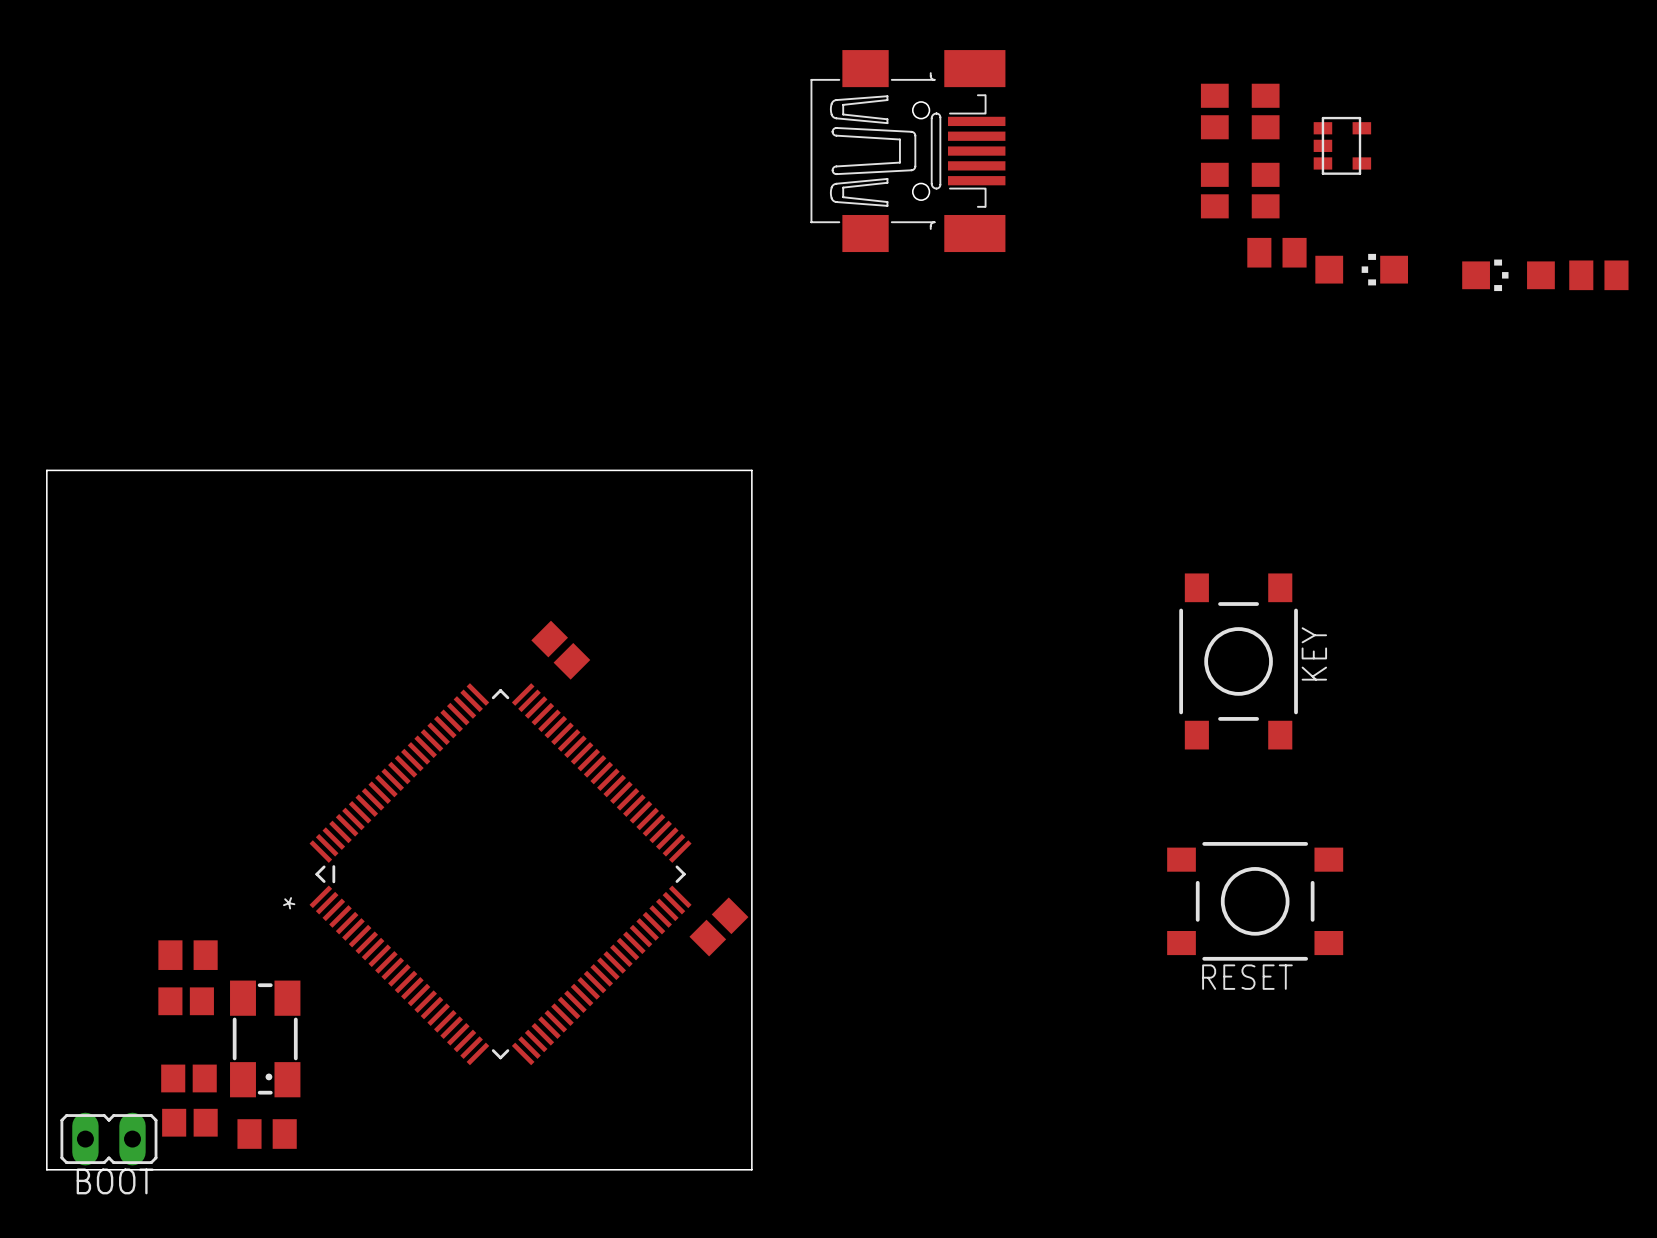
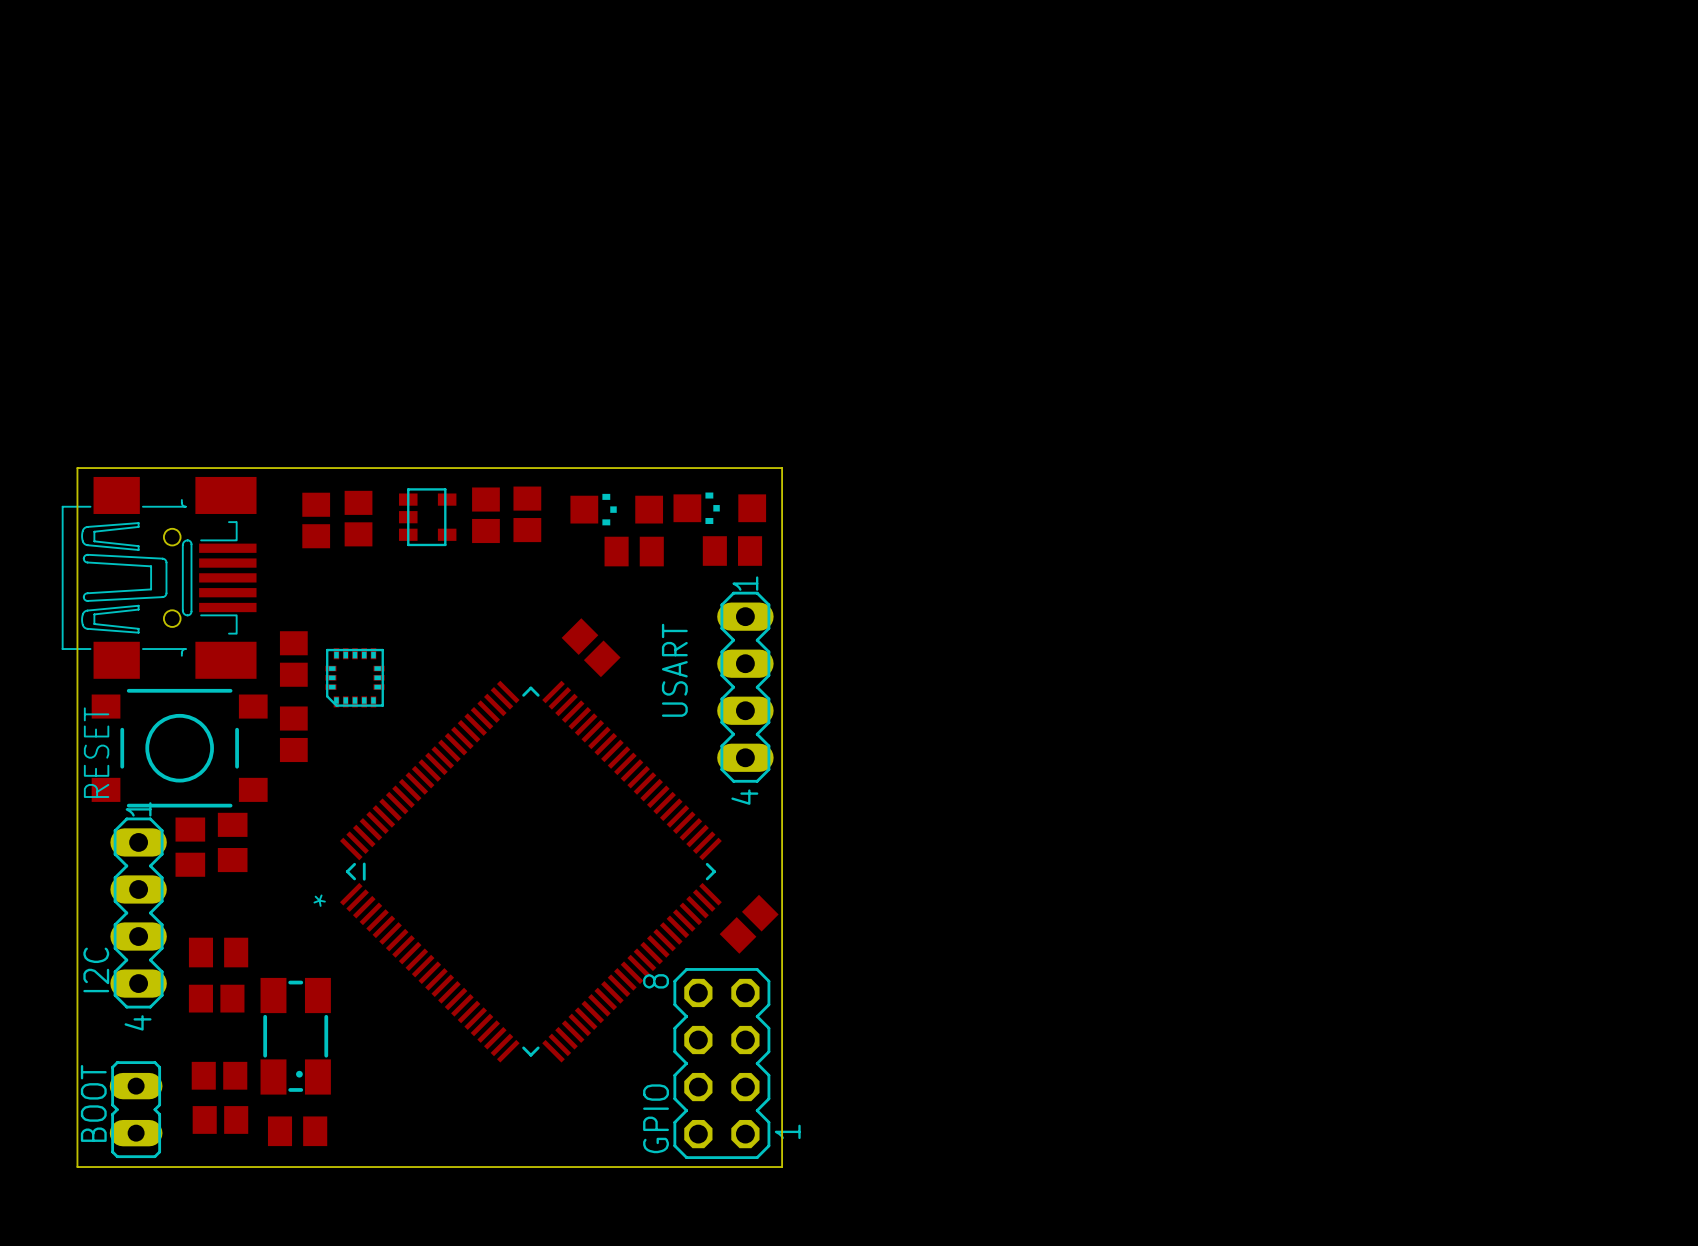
part: (1214, 111) -> none
part: (1265, 111) -> none
part: (1342, 145) -> none
part: (907, 151) -> none
part: (1214, 190) -> none
part: (1265, 190) -> none
part: (1276, 252) -> none
part: (1361, 269) -> none
part: (1508, 275) -> none
part: (1598, 275) -> none
part: none -> (719, 508)
part: none -> (616, 509)
part: none -> (527, 514)
part: none -> (485, 515)
part: none -> (427, 517)
part: none -> (358, 518)
part: none -> (316, 520)
part: none -> (634, 551)
part: none -> (732, 551)
part: none -> (159, 577)
part: none -> (293, 658)
KEY: (1238, 661) -> none
part: none -> (354, 677)
USART: none -> (745, 687)
part: none -> (293, 734)
RESET: none -> (179, 748)
part: none -> (232, 842)
part: none -> (190, 847)
RESET: (1255, 901) -> none
I2C: none -> (138, 913)
GPIO: none -> (721, 1063)
BOOT rotation: 0° (108, 1139) -> 90° clockwise (136, 1109)

